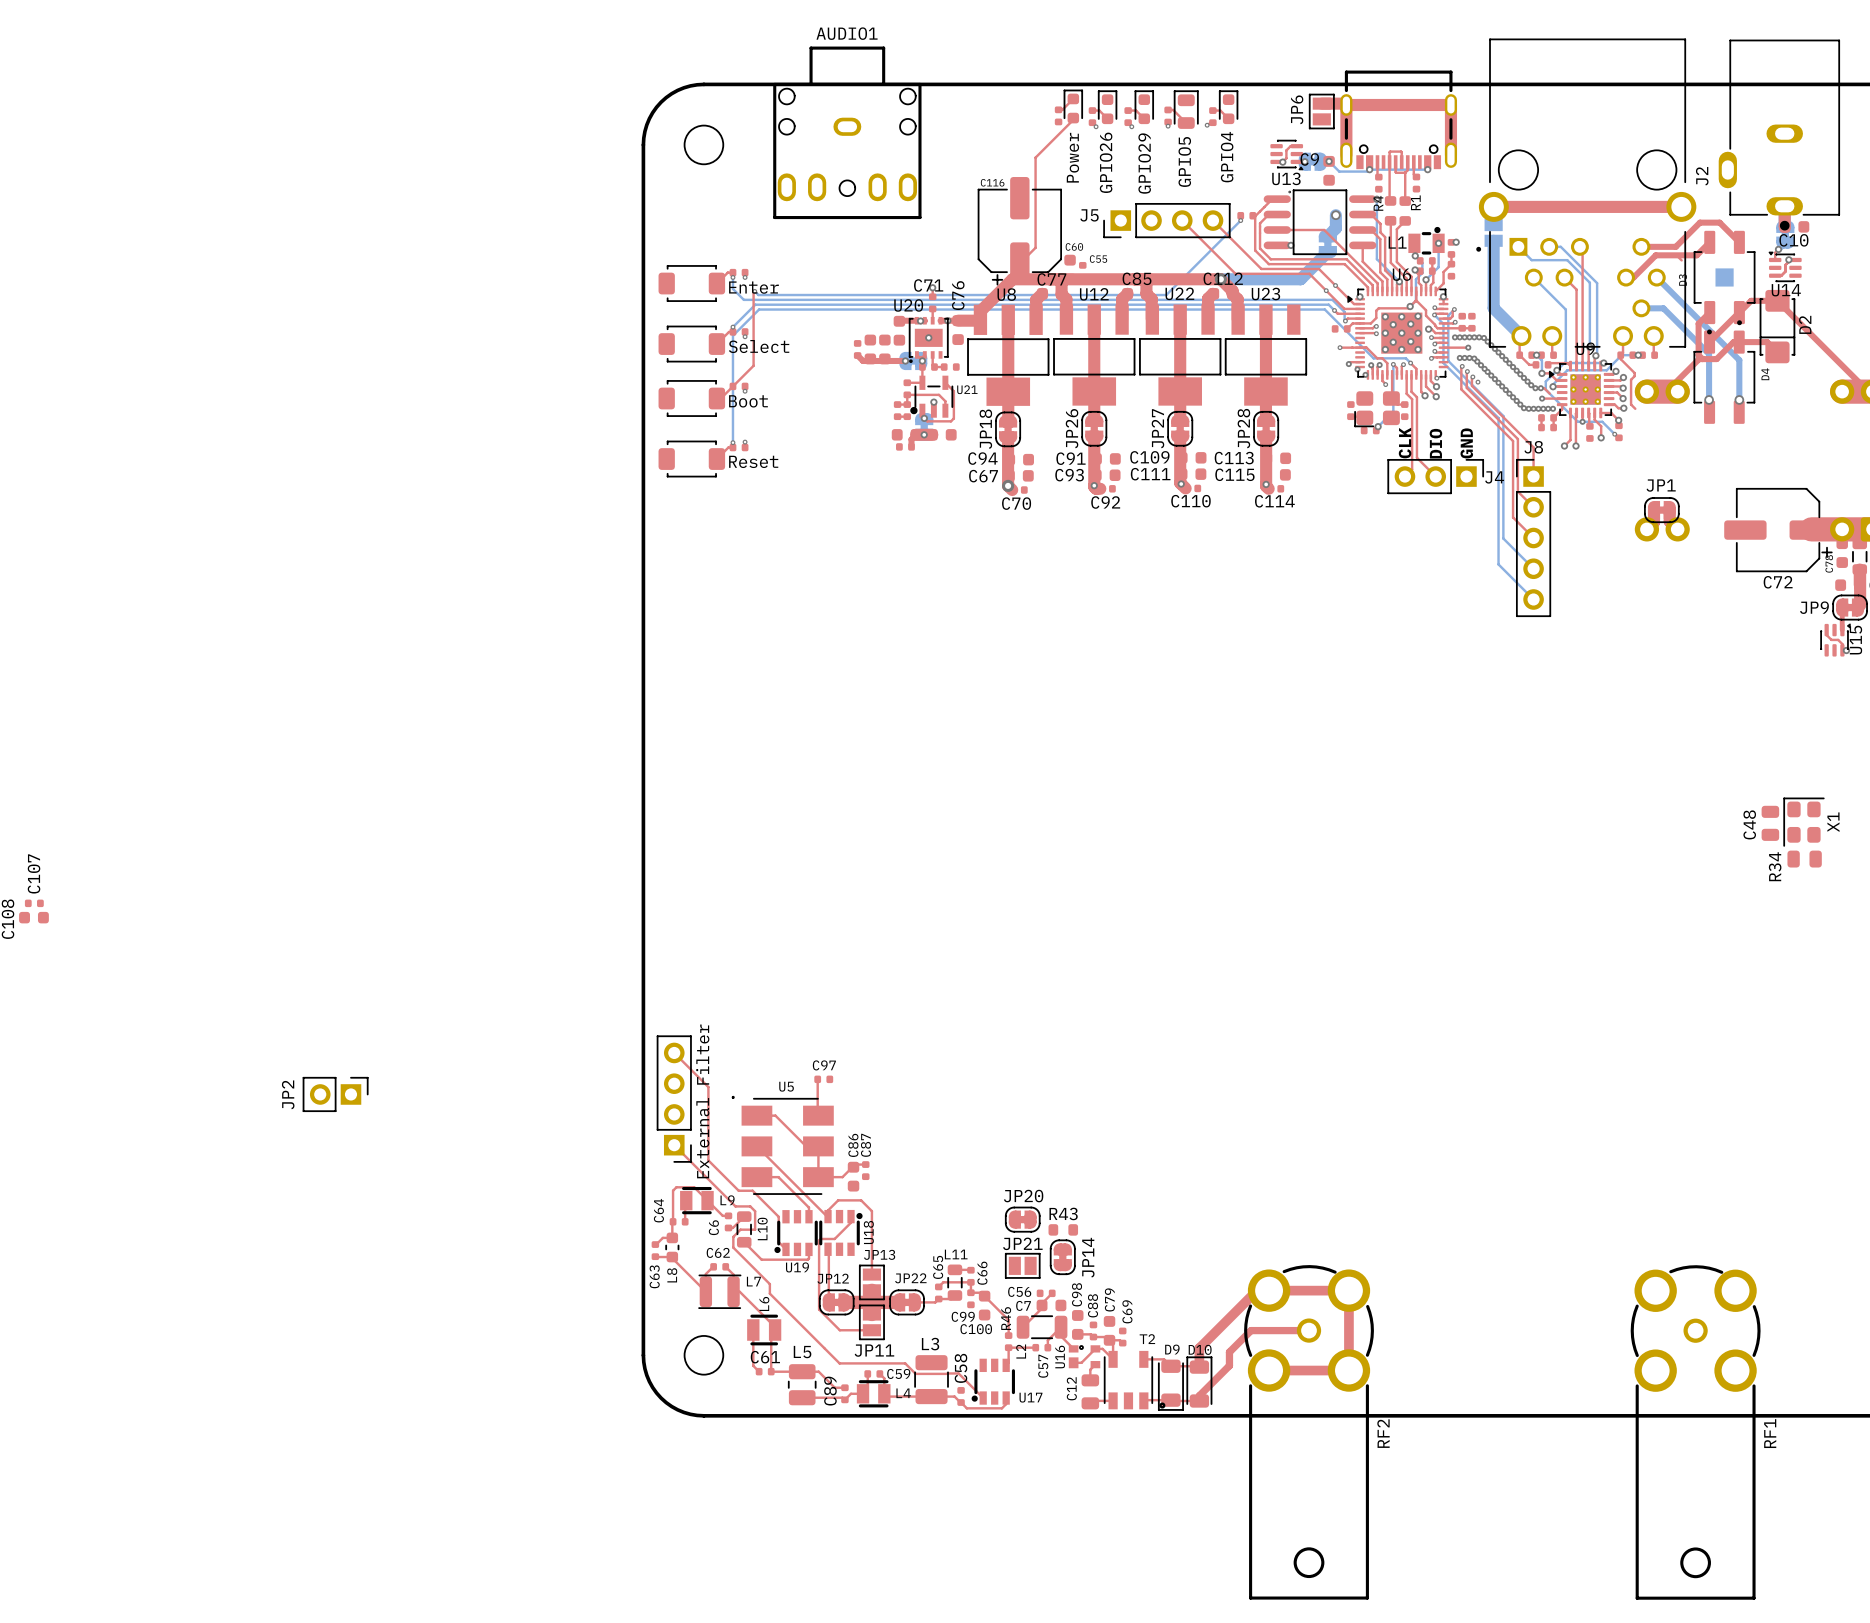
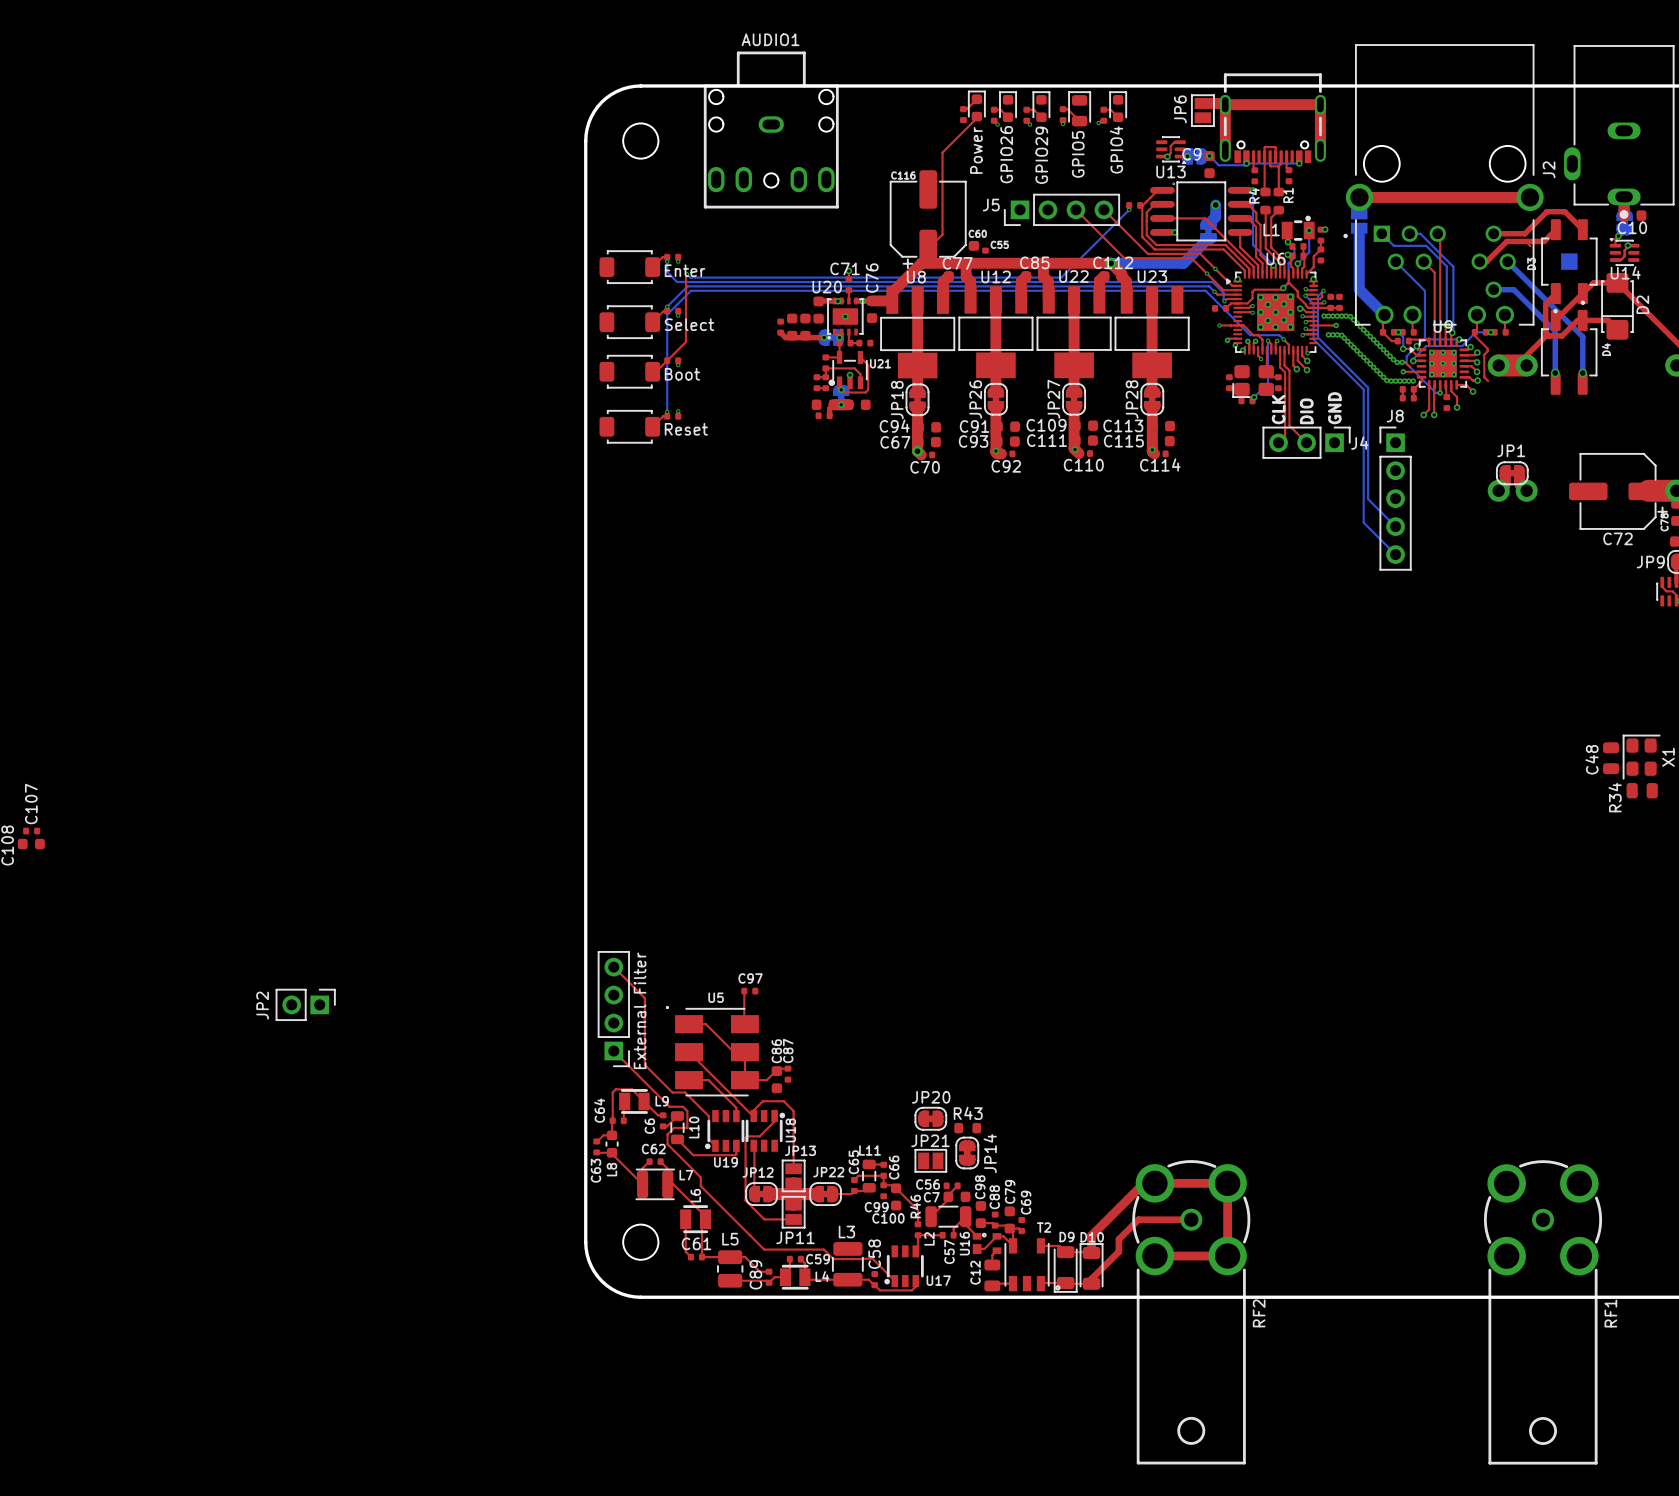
top track: (1462, 366) (1461, 389) (1513, 441) (1513, 517) (1533, 538) -> none
via: (1462, 366) -> none
top track: (1467, 371) (1466, 387) (1517, 439) (1517, 491) (1533, 507) -> none
via: (1467, 371) -> none
top track: (1472, 376) (1471, 385) (1533, 447) (1533, 476) -> none
via: (1472, 376) -> none
via: (1477, 382) -> none
bottom track: (1582, 421) (1602, 421) (1614, 434) -> none
part: (1618, 431) -> none
via: (1614, 434) -> none

